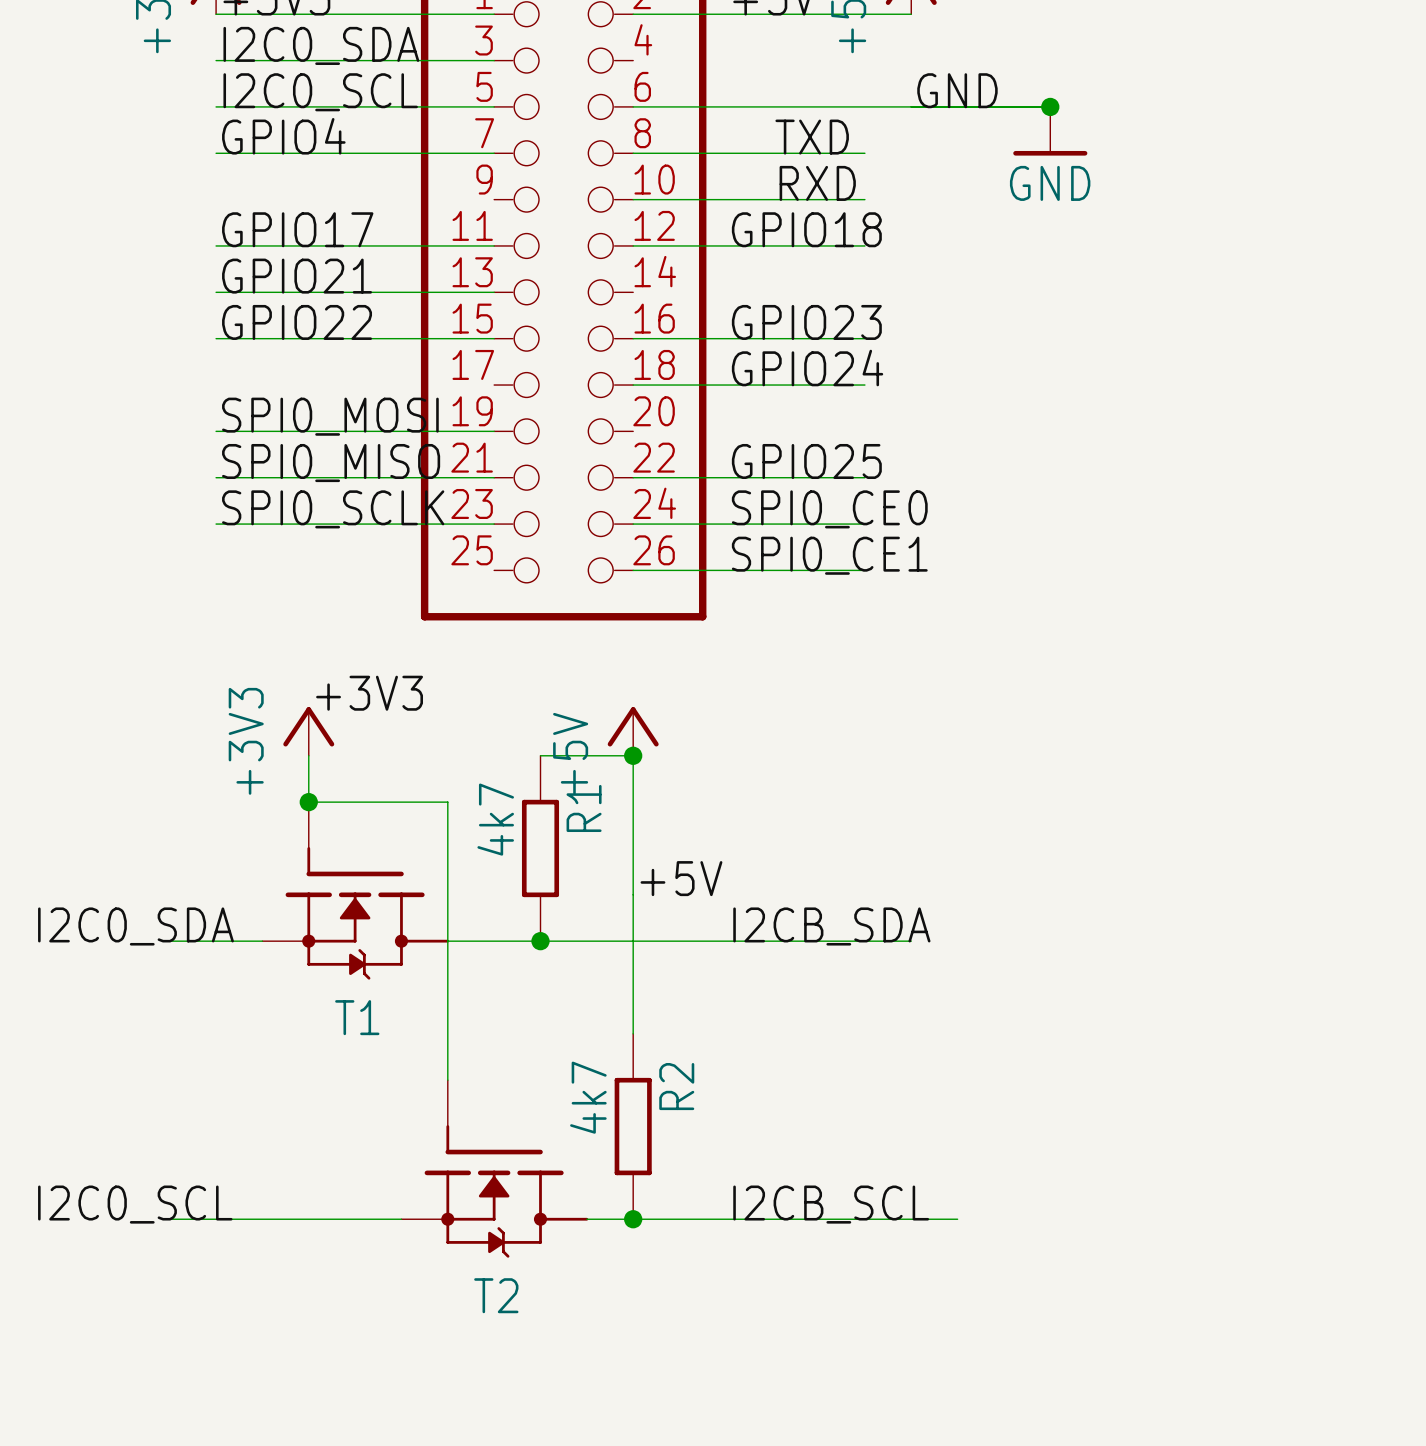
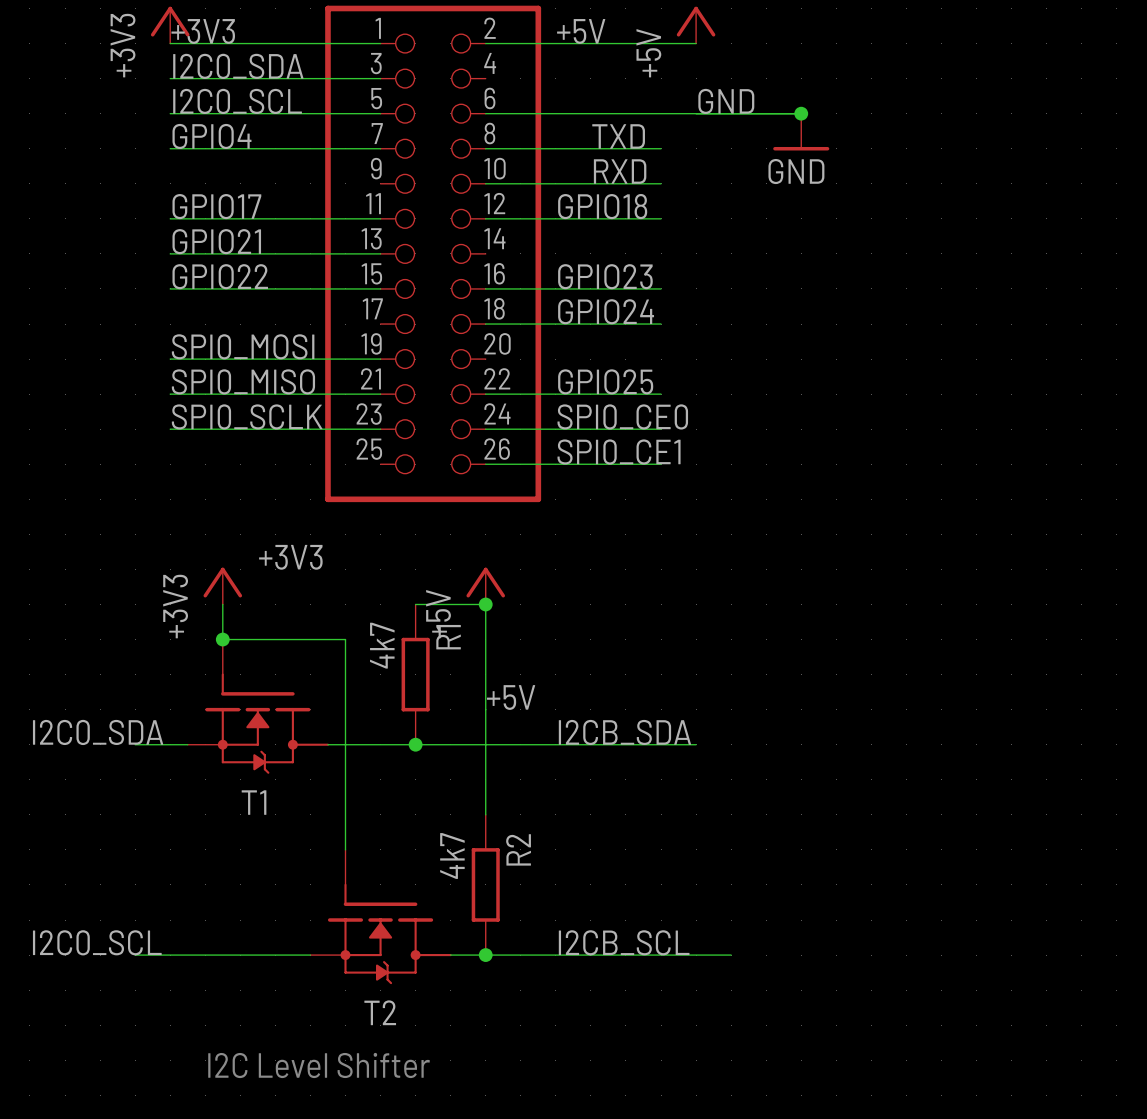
label position: +3V3 (369, 693) -> +3V3 (290, 557)
power symbol position: +3V3 (308, 731) -> +3V3 (222, 586)
wire: (308, 755) (308, 802) -> (222, 604) (222, 639) (240, 639)
junction position: (308, 802) -> (222, 639)
T1 position: (355, 890) -> (258, 706)
text: none -> I2C Level Shifter (319, 1065)

